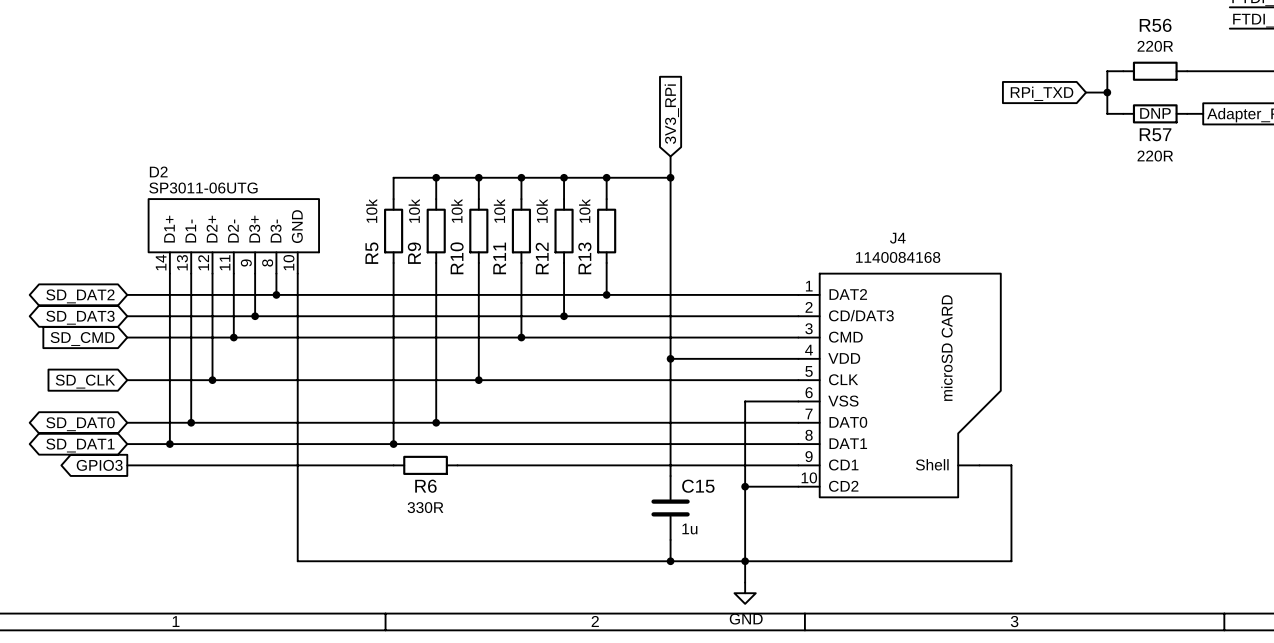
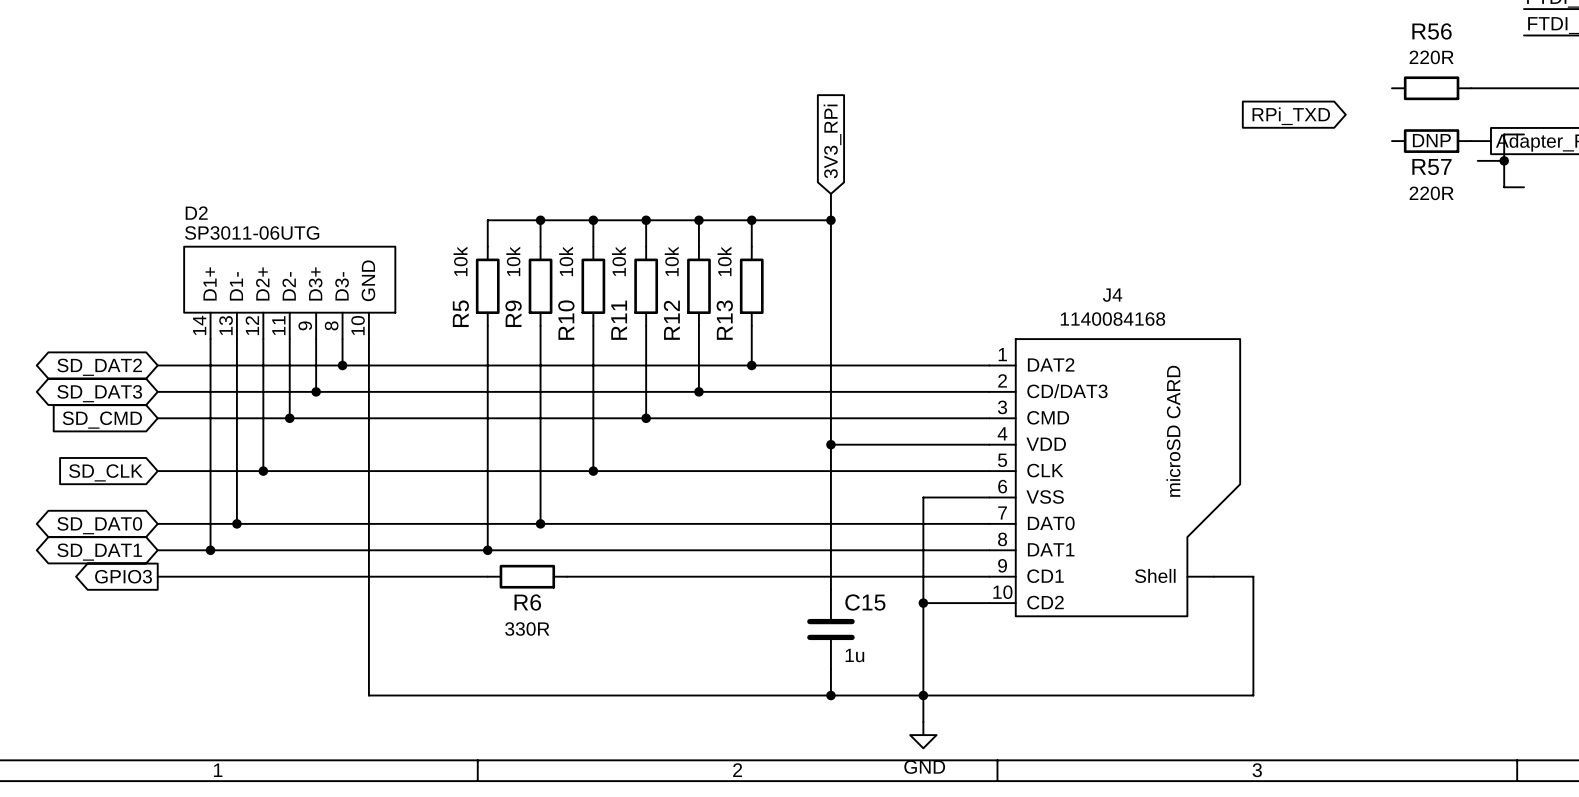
wire: (1123, 71) (1107, 71) (1107, 113) (1123, 113) -> (1523, 134) (1504, 134) (1504, 187) (1523, 187)
wire: (1086, 92) (1107, 92) -> (1477, 160) (1504, 160)
junction: (1107, 92) -> none
junction: none -> (1504, 160)

